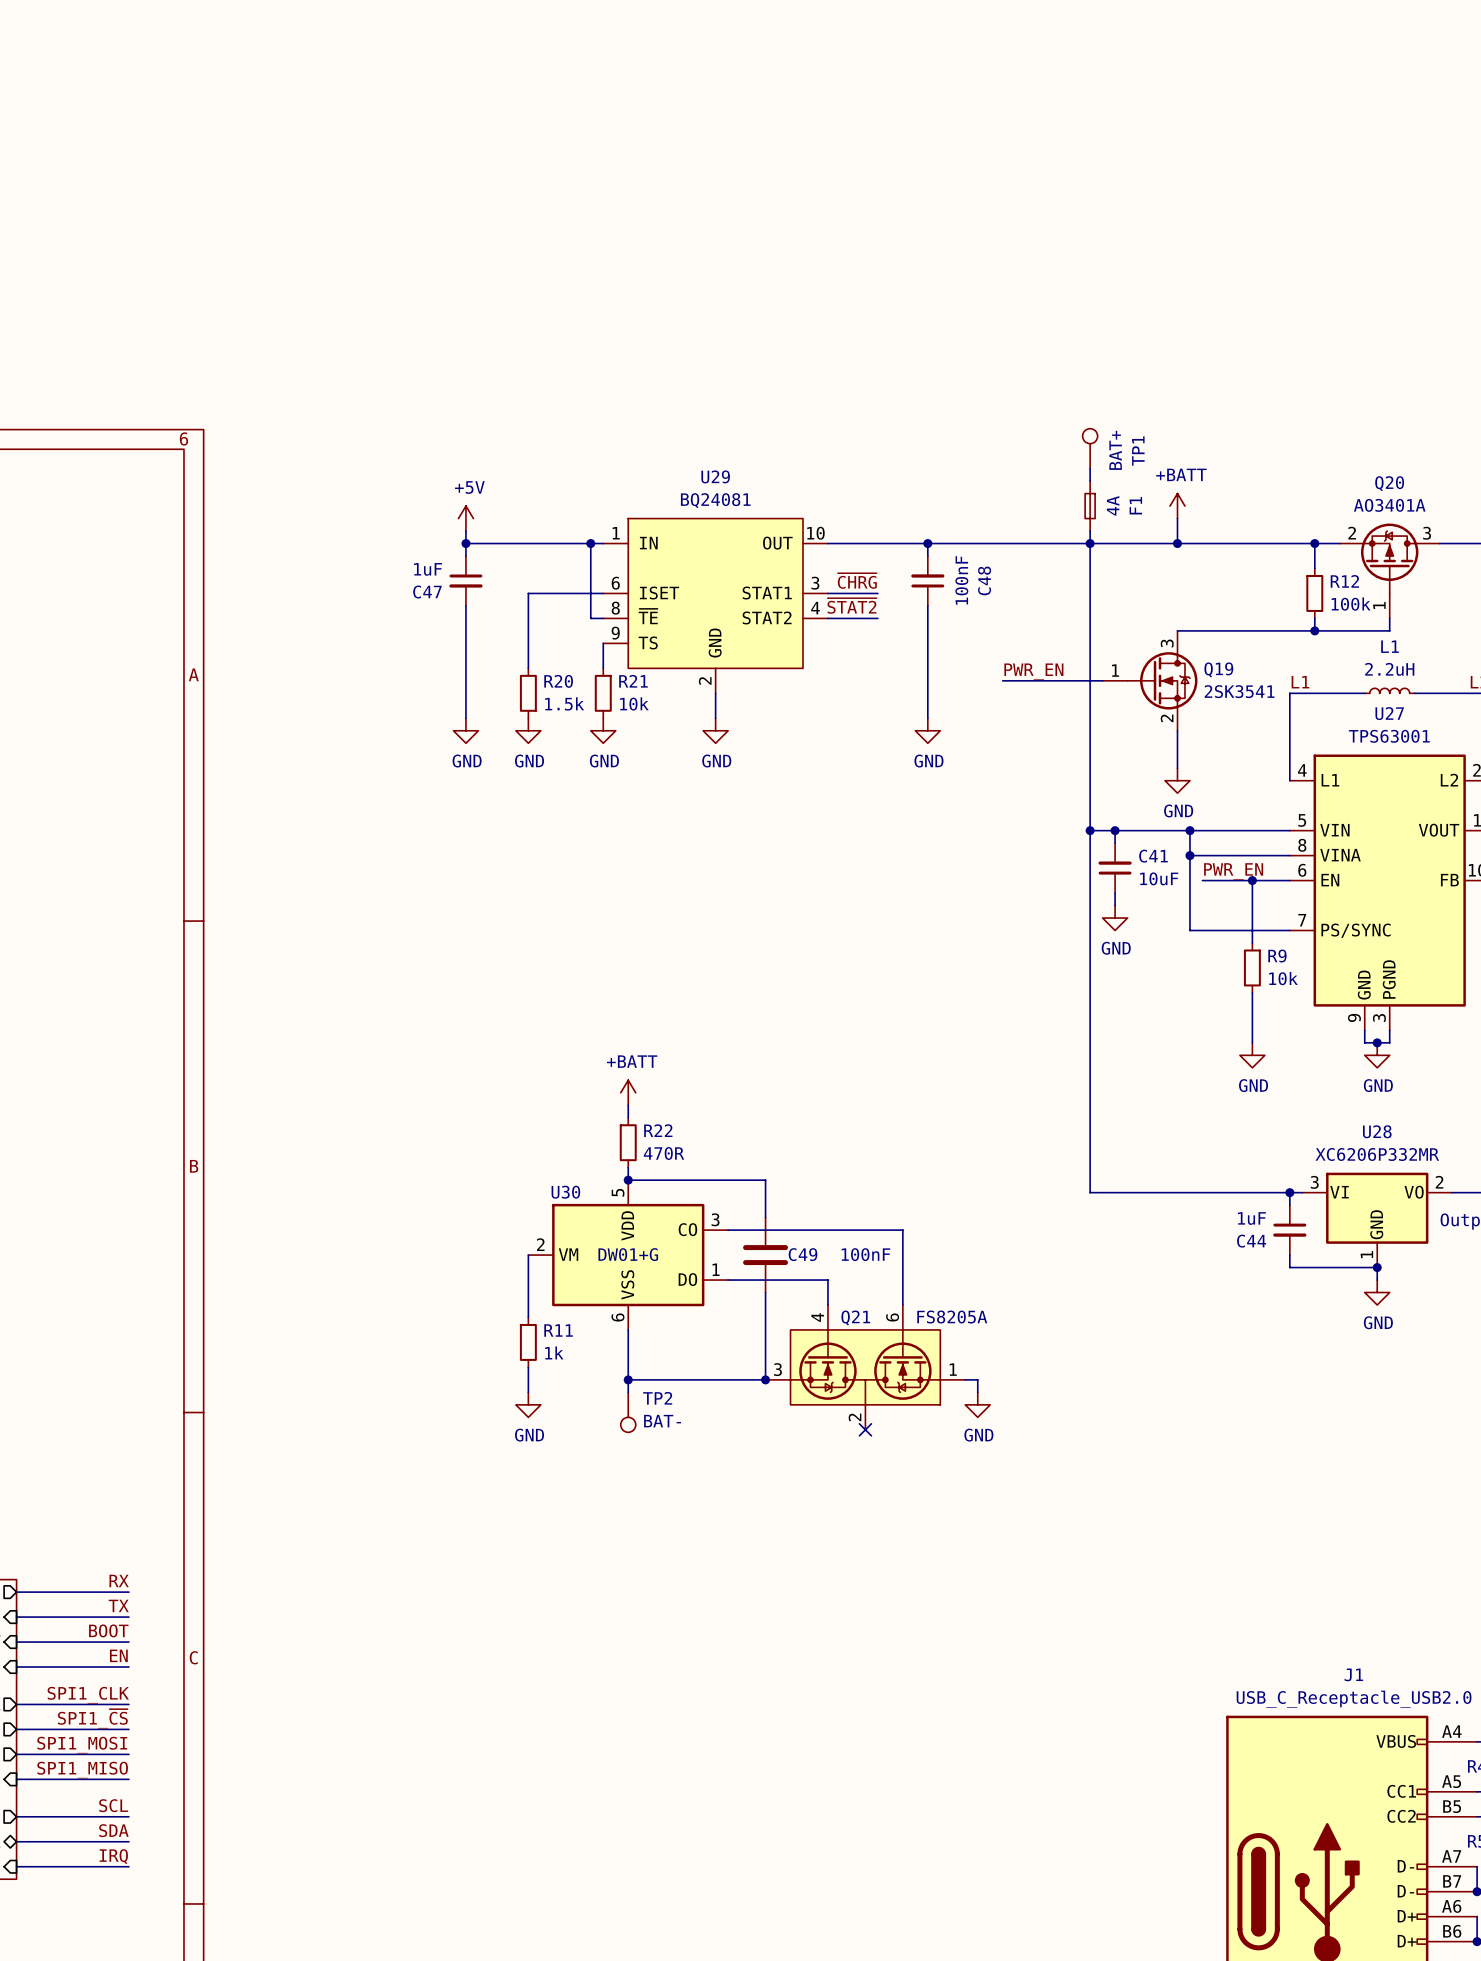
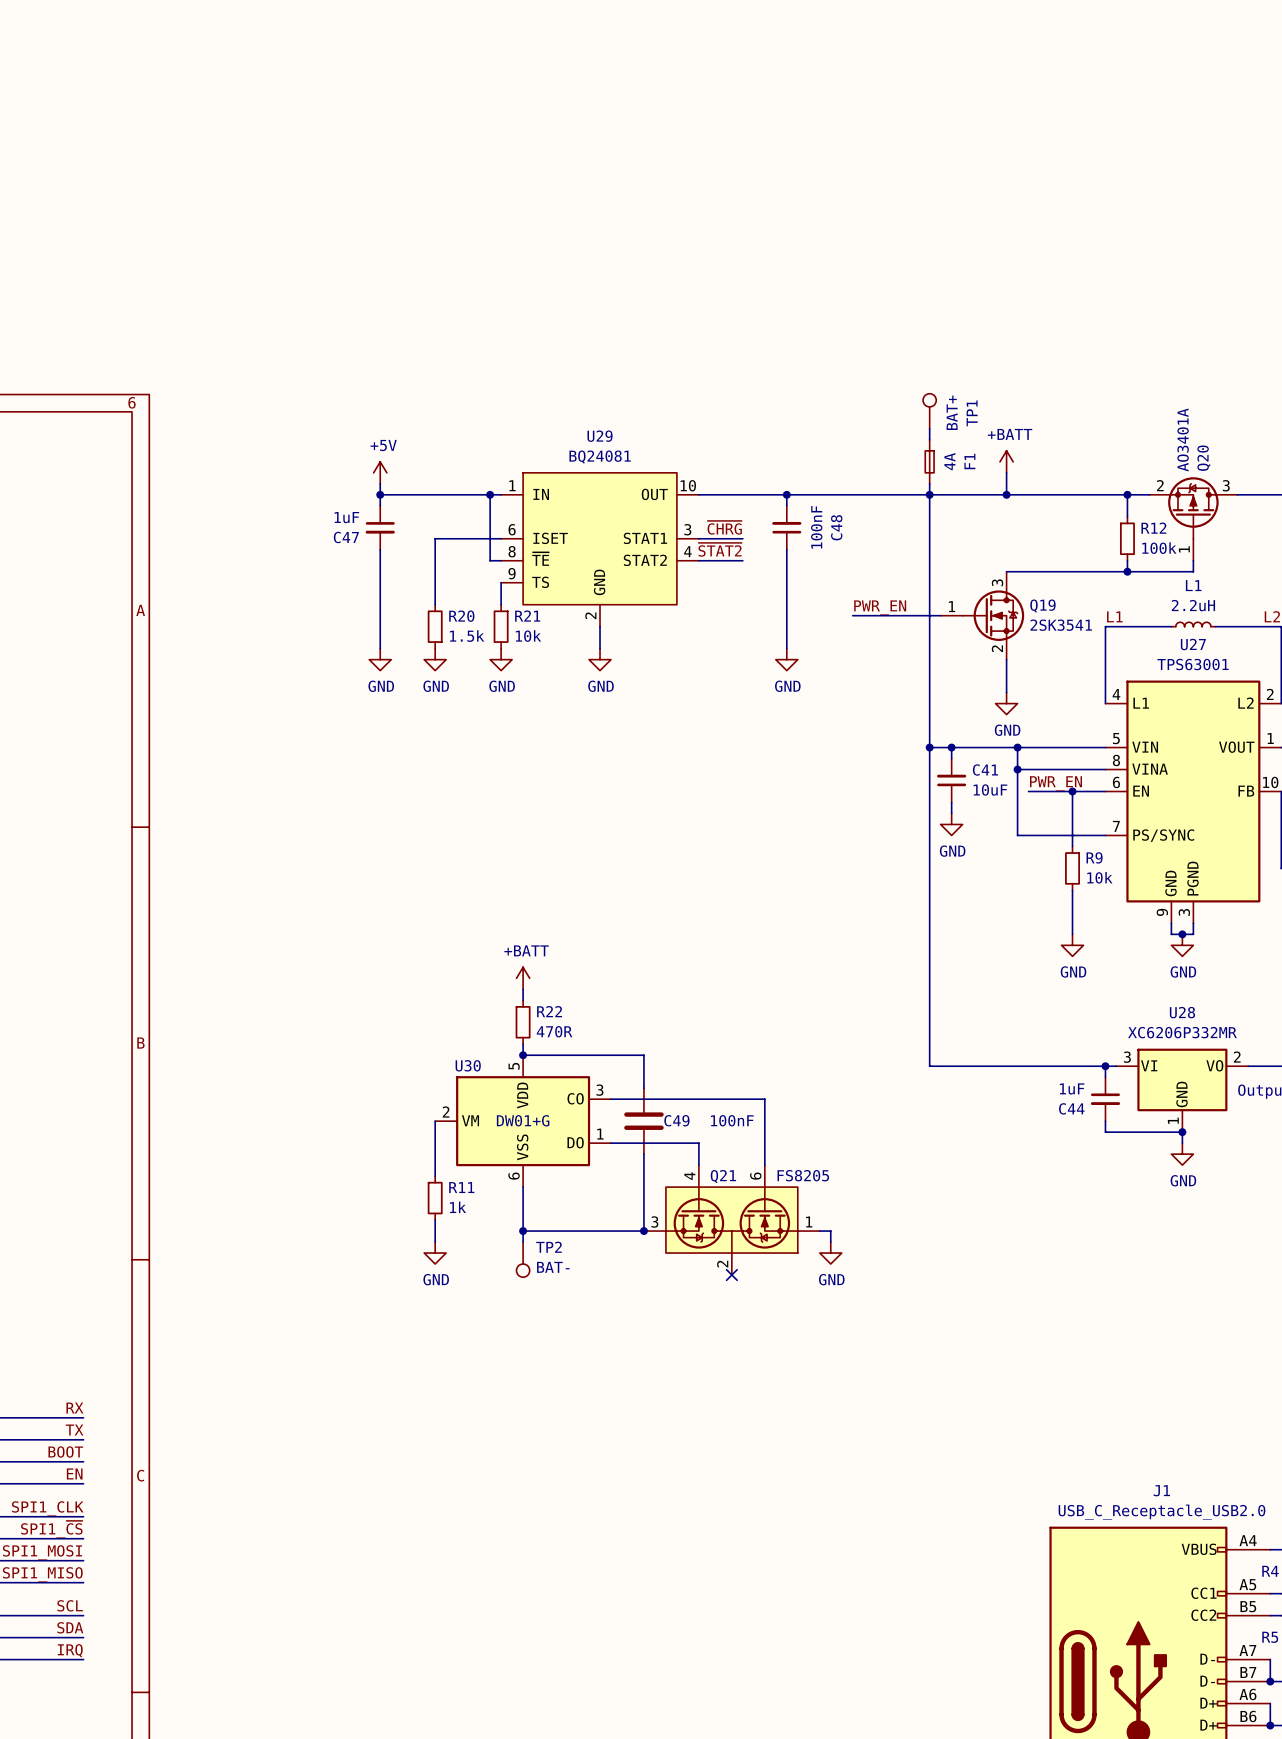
Q20 name rotation: 0° (1389, 483) -> 90° counterclockwise (1203, 458)
Q20 value rotation: 0° (1389, 505) -> 90° counterclockwise (1183, 439)
Q21 value: FS8205A (952, 1317) -> FS8205 (803, 1175)

